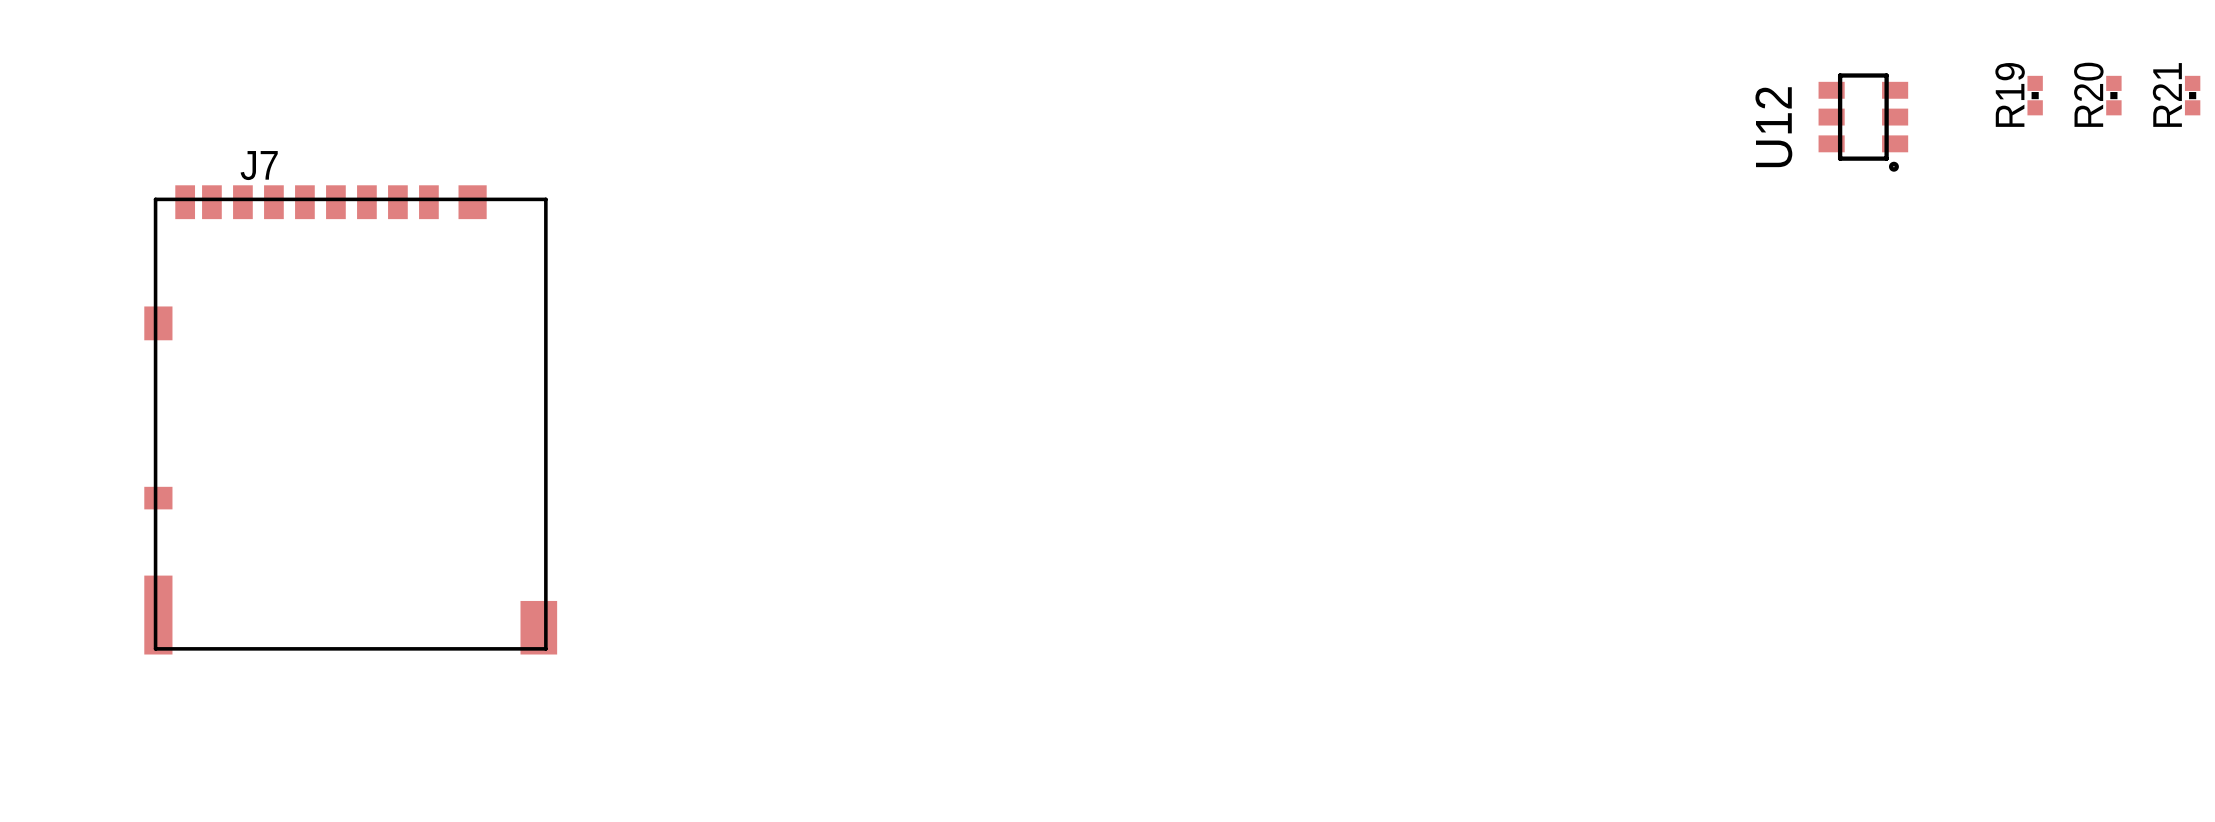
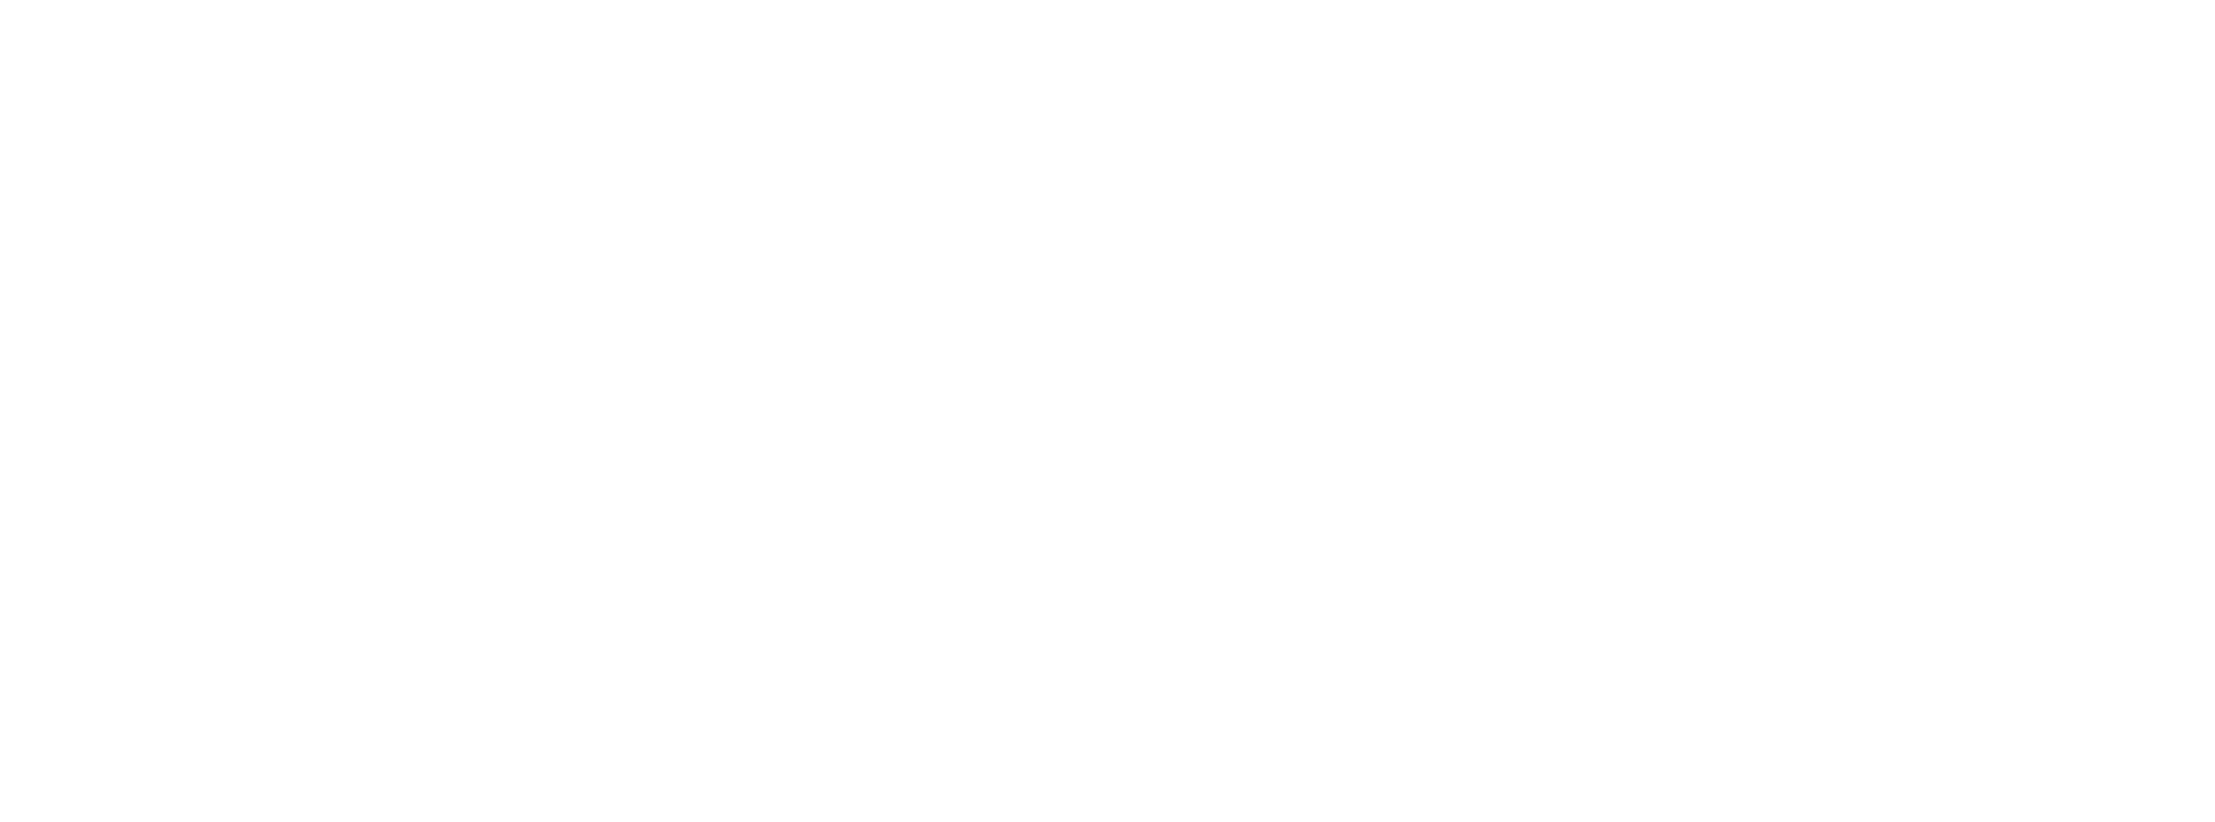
R19: (2035, 95) -> none
R20: (2113, 95) -> none
R21: (2192, 95) -> none
U12: (1863, 122) -> none
J7: (350, 419) -> none

